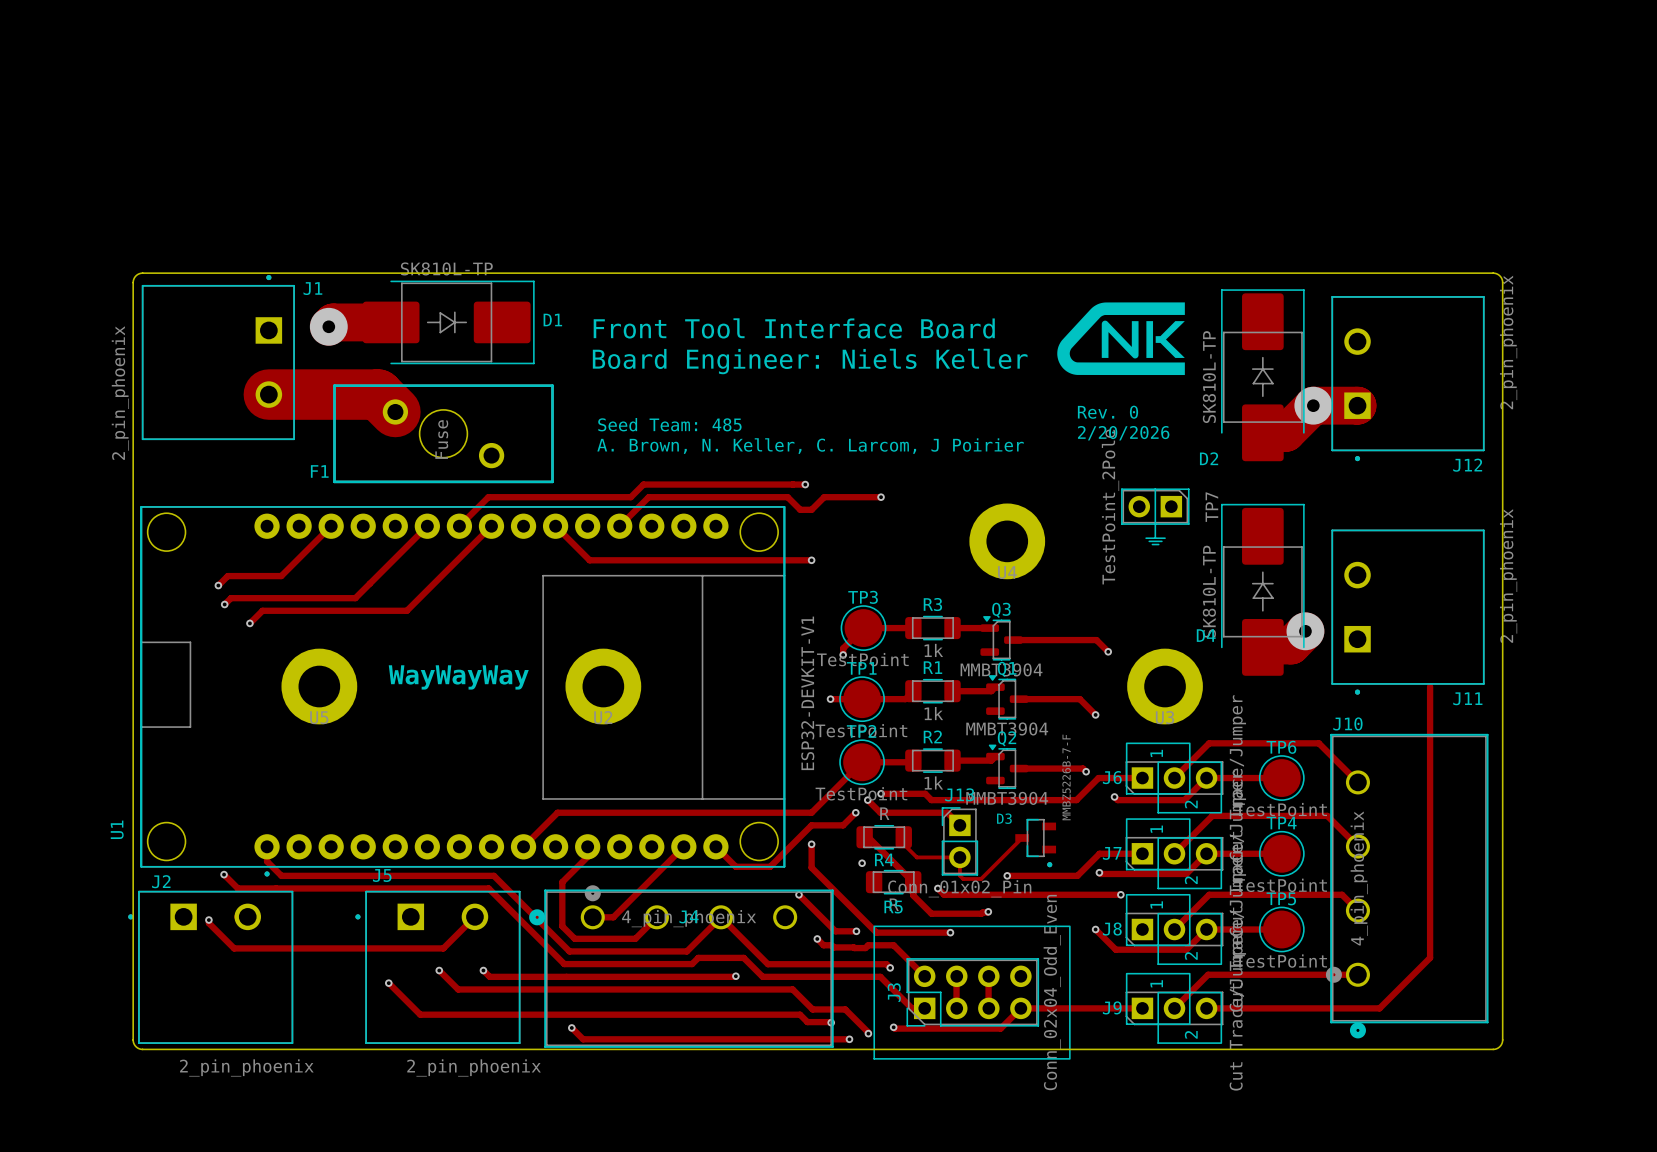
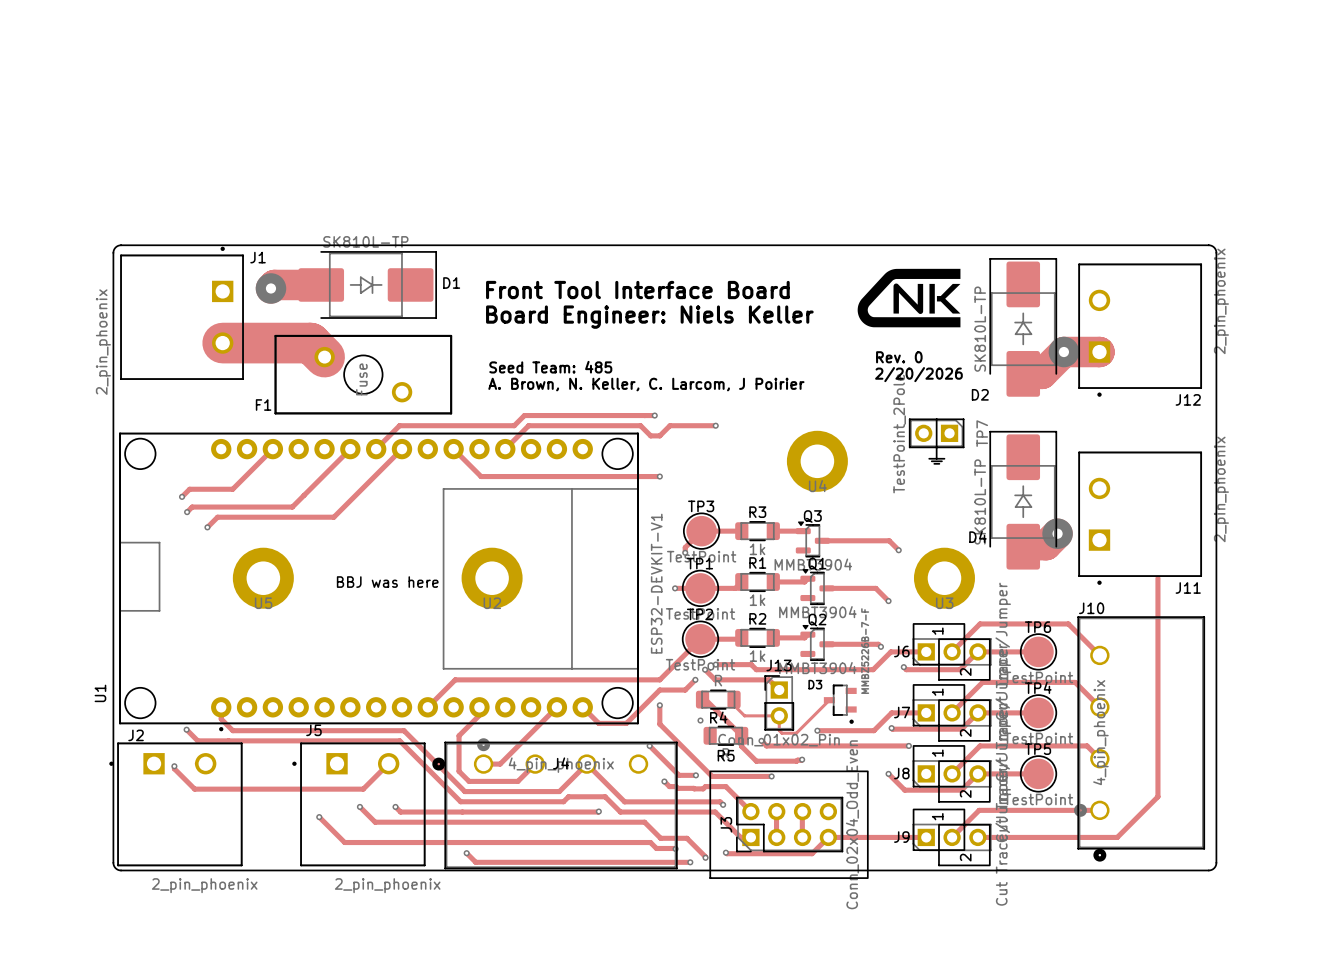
text: WayWayWay (458, 677) -> none
text: none -> BBJ was here (387, 582)

